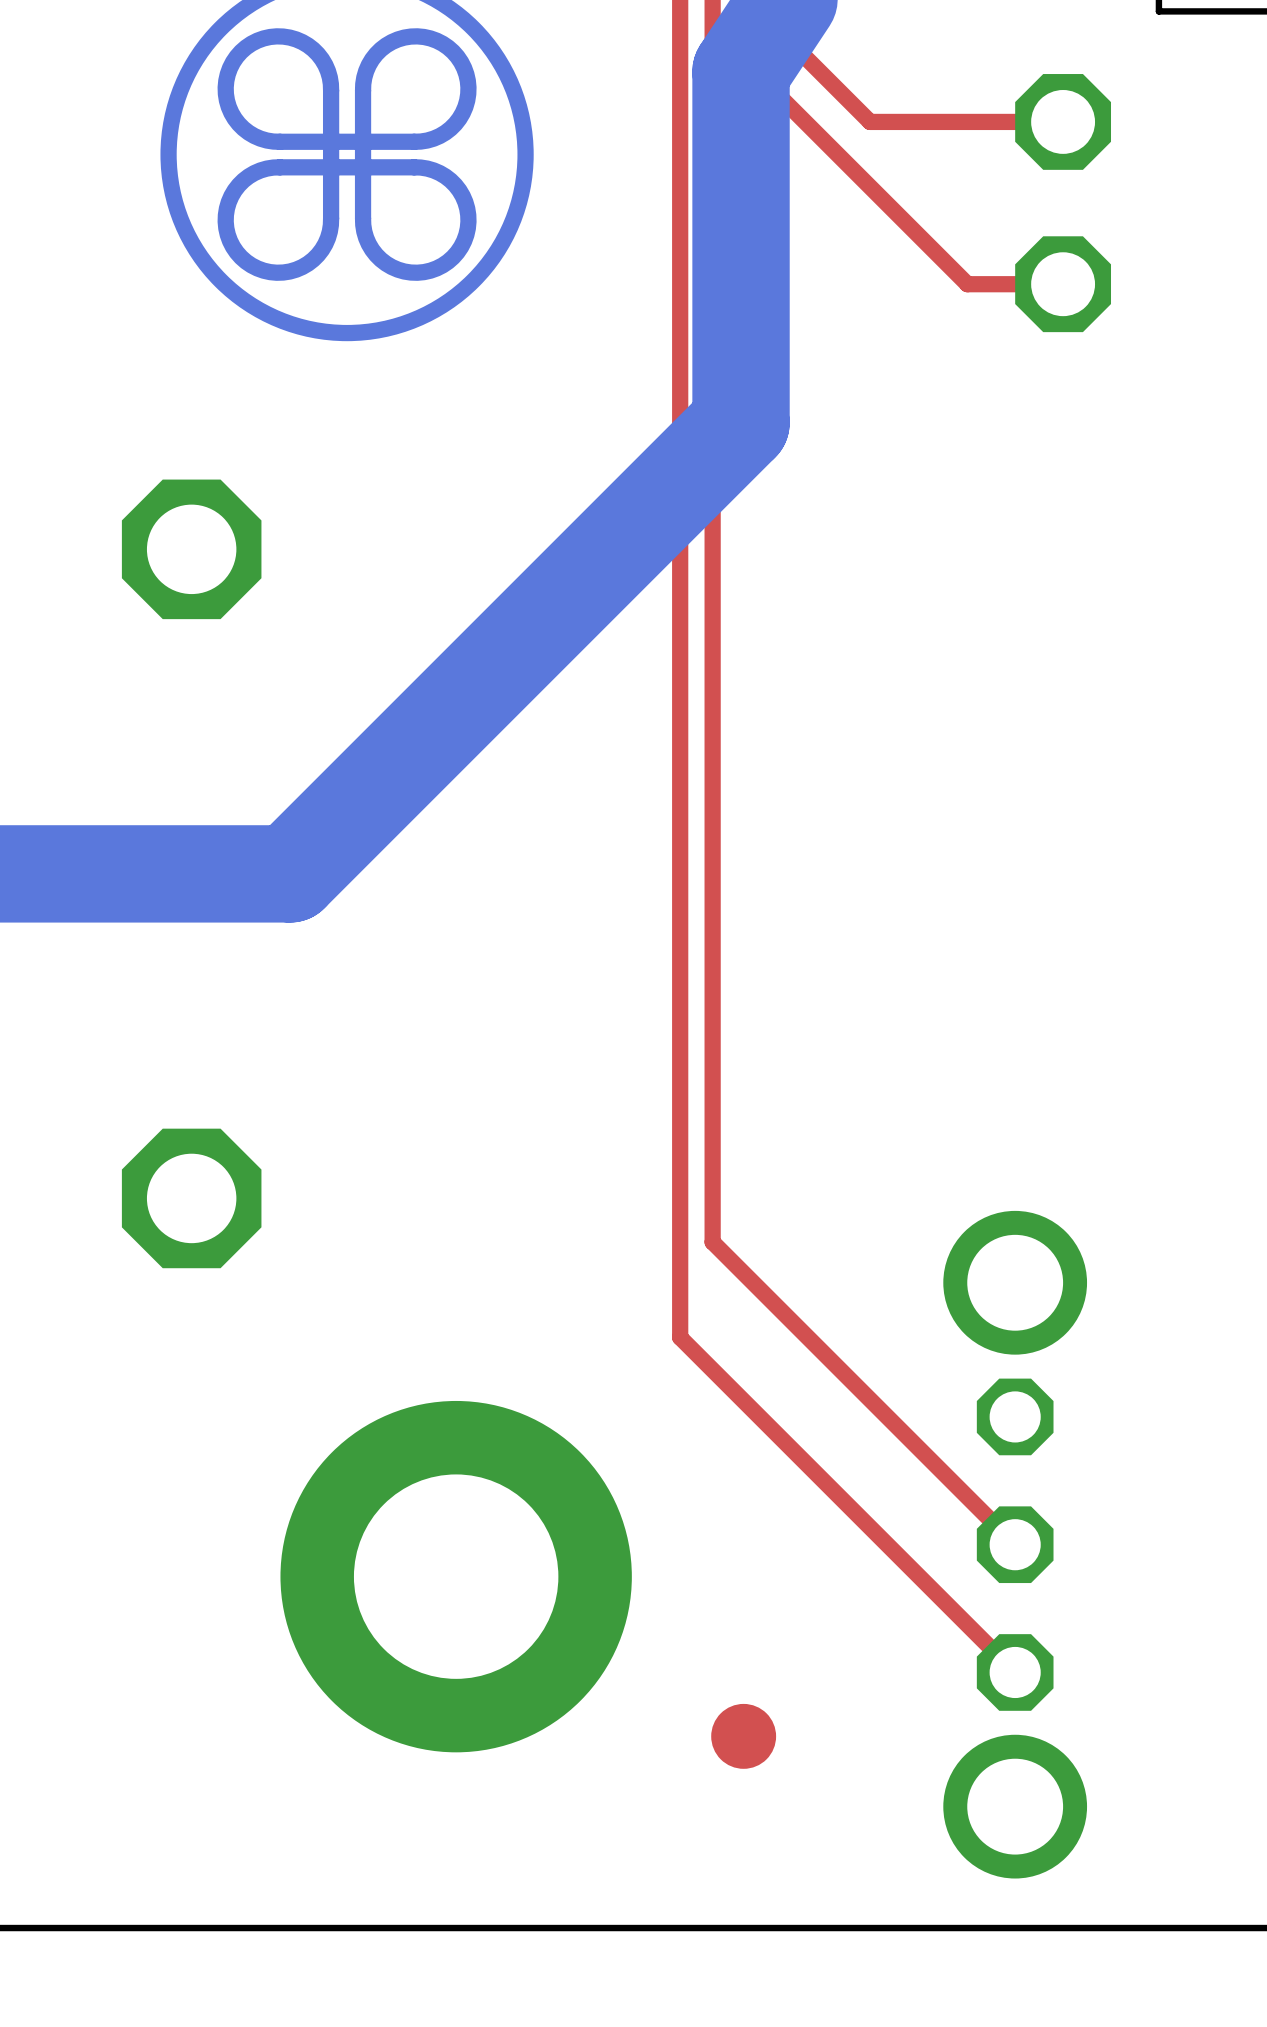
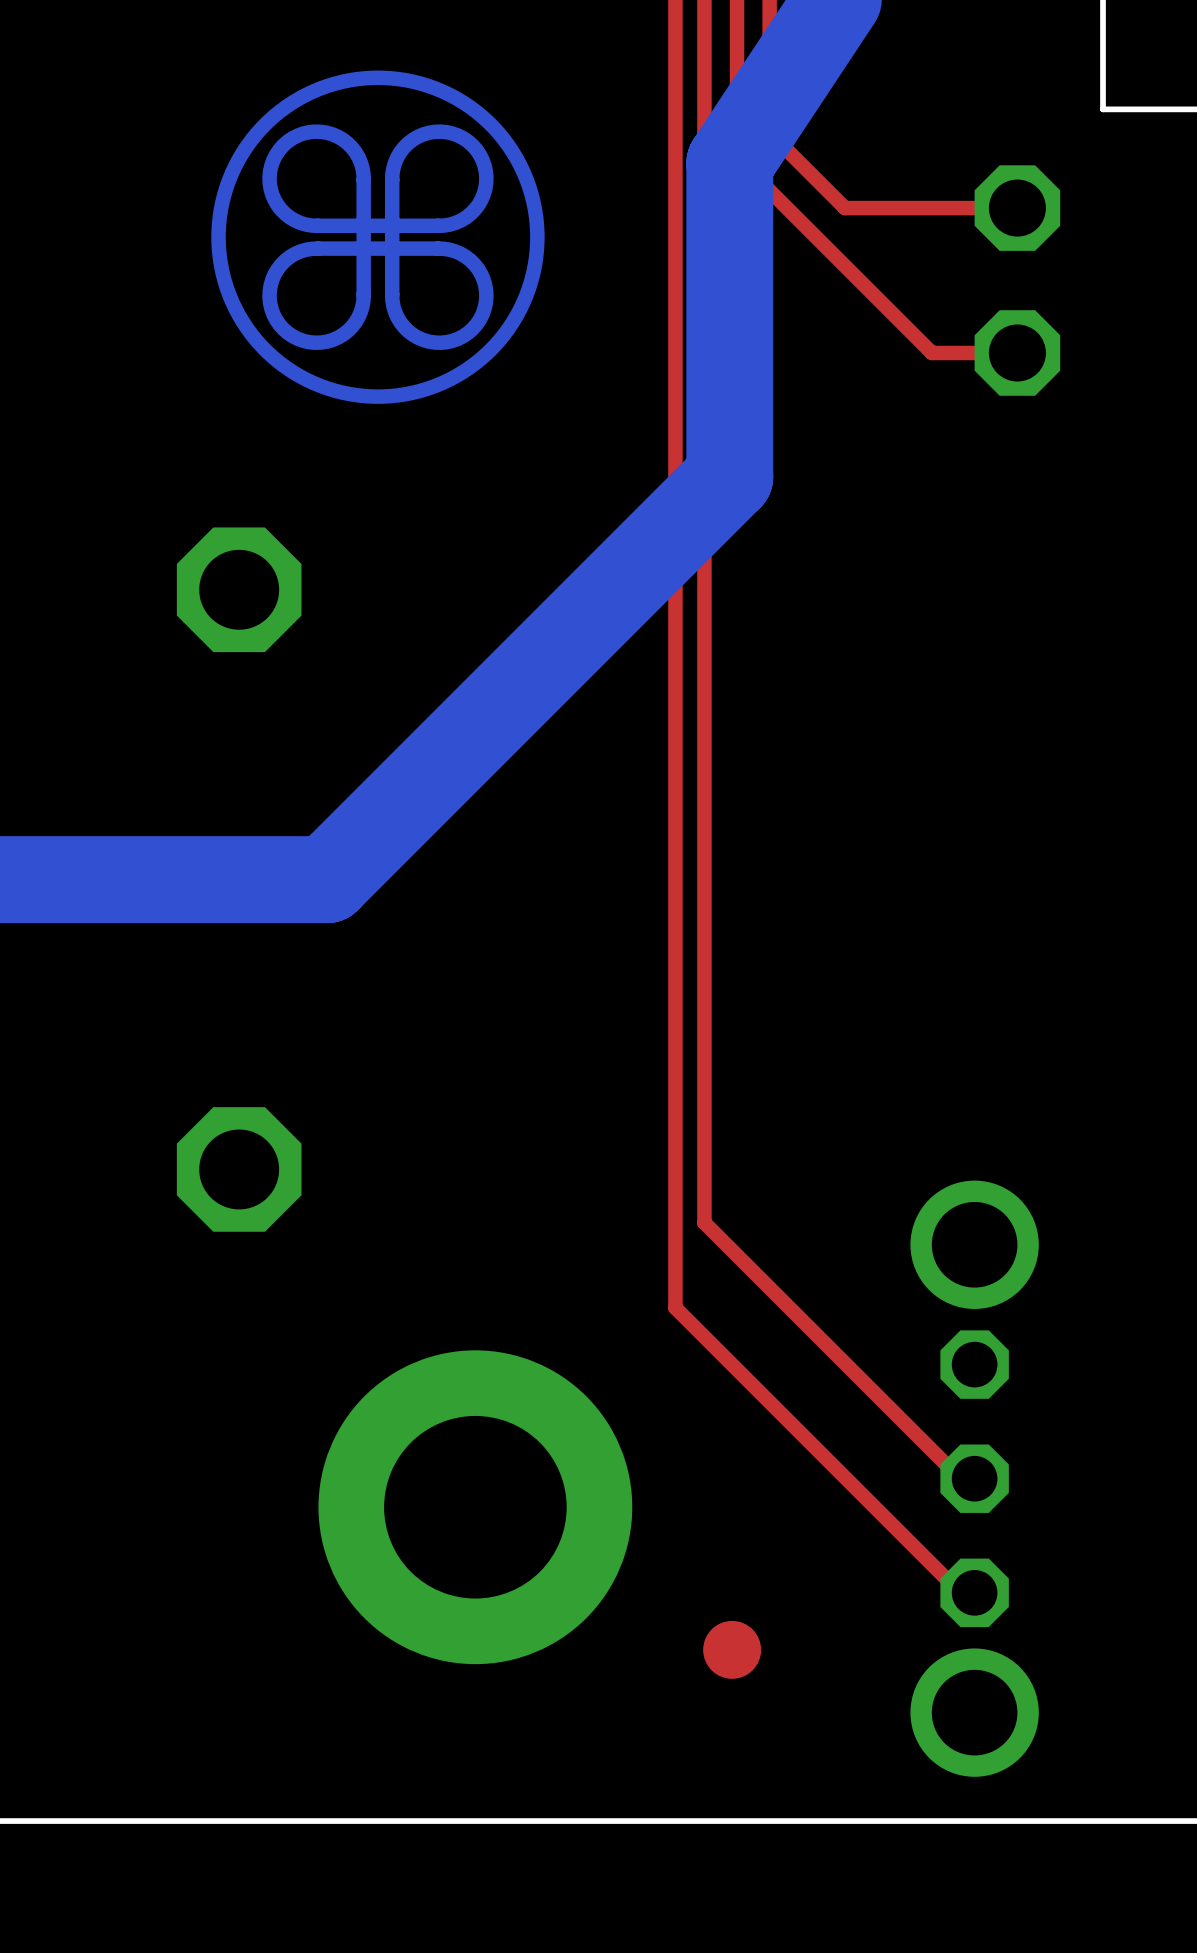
top track: (712, 1242) (1015, 1544) -> (704, 1208) (704, 1222) (960, 1478)
top track: (680, 1337) (1015, 1672) -> (675, 1293) (675, 1307) (960, 1592)

